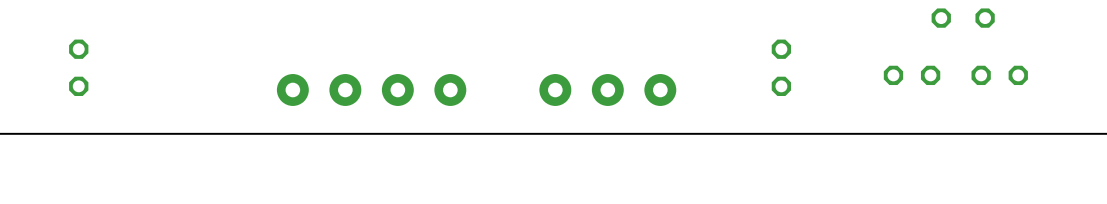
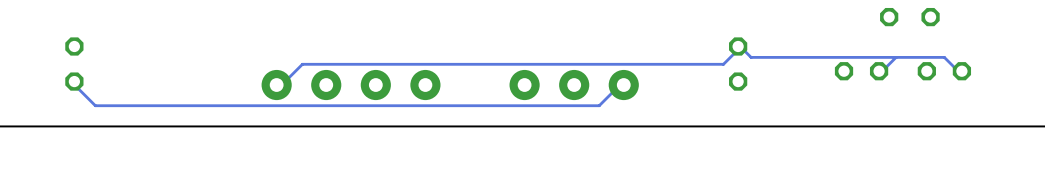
track: none -> (896, 57) (882, 71) (879, 71)
track: none -> (961, 71) (958, 71) (944, 57) (751, 57) (738, 46) (737, 50) (723, 64) (302, 64) (281, 85) (276, 85)
track: none -> (74, 81) (74, 85) (95, 105) (599, 105) (619, 85) (623, 85)

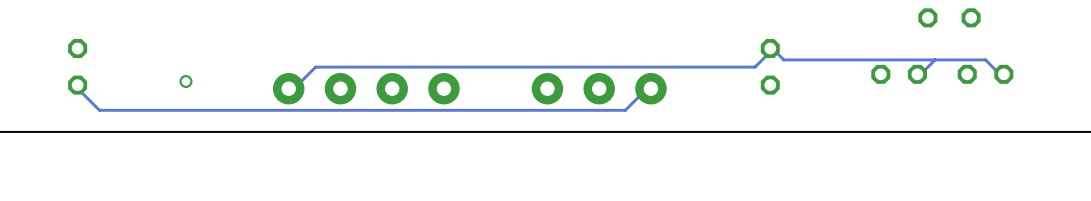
via: none -> (185, 81)

